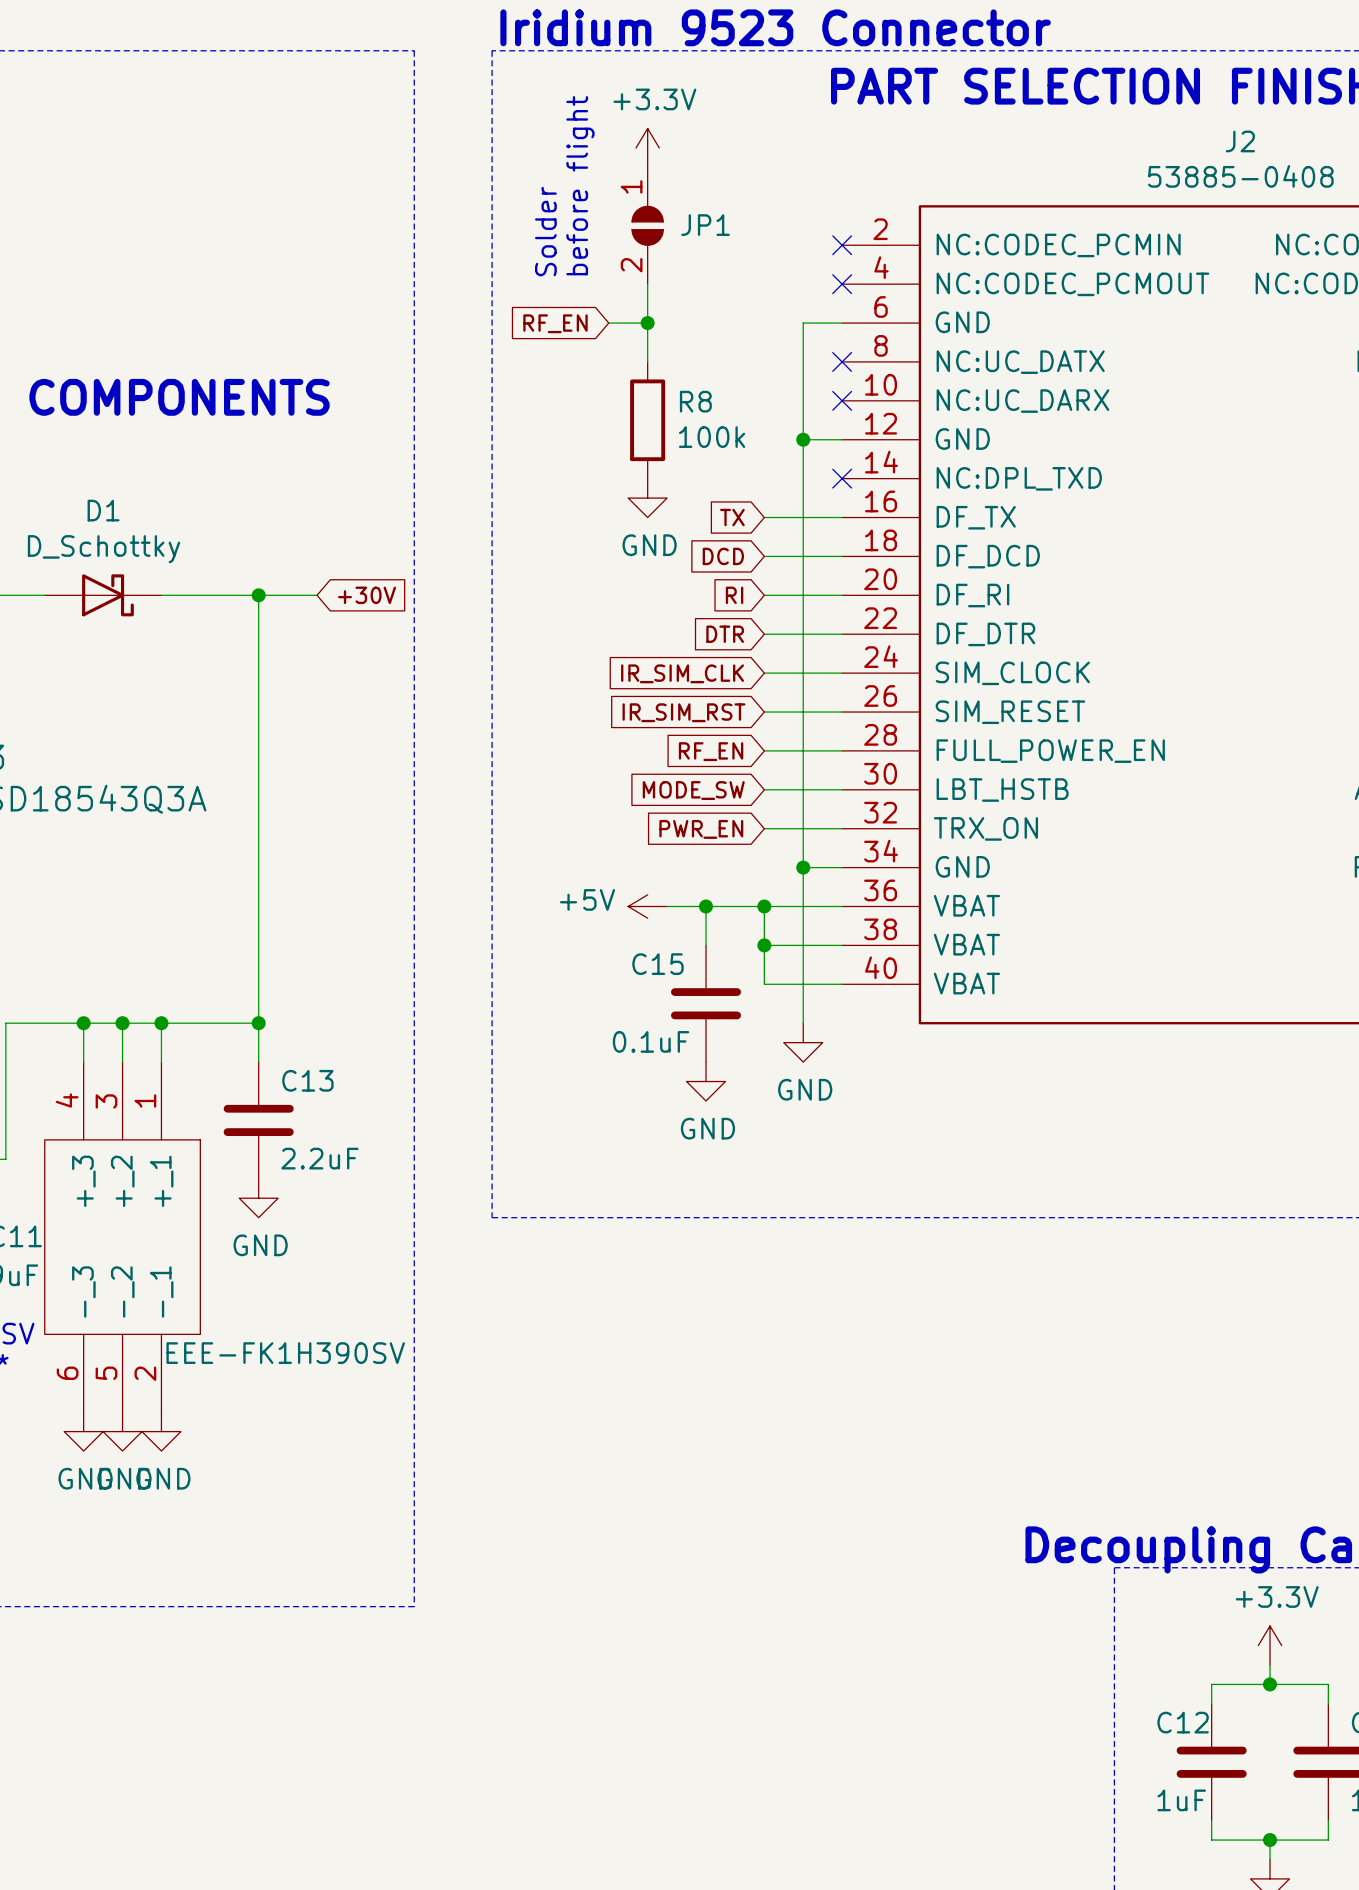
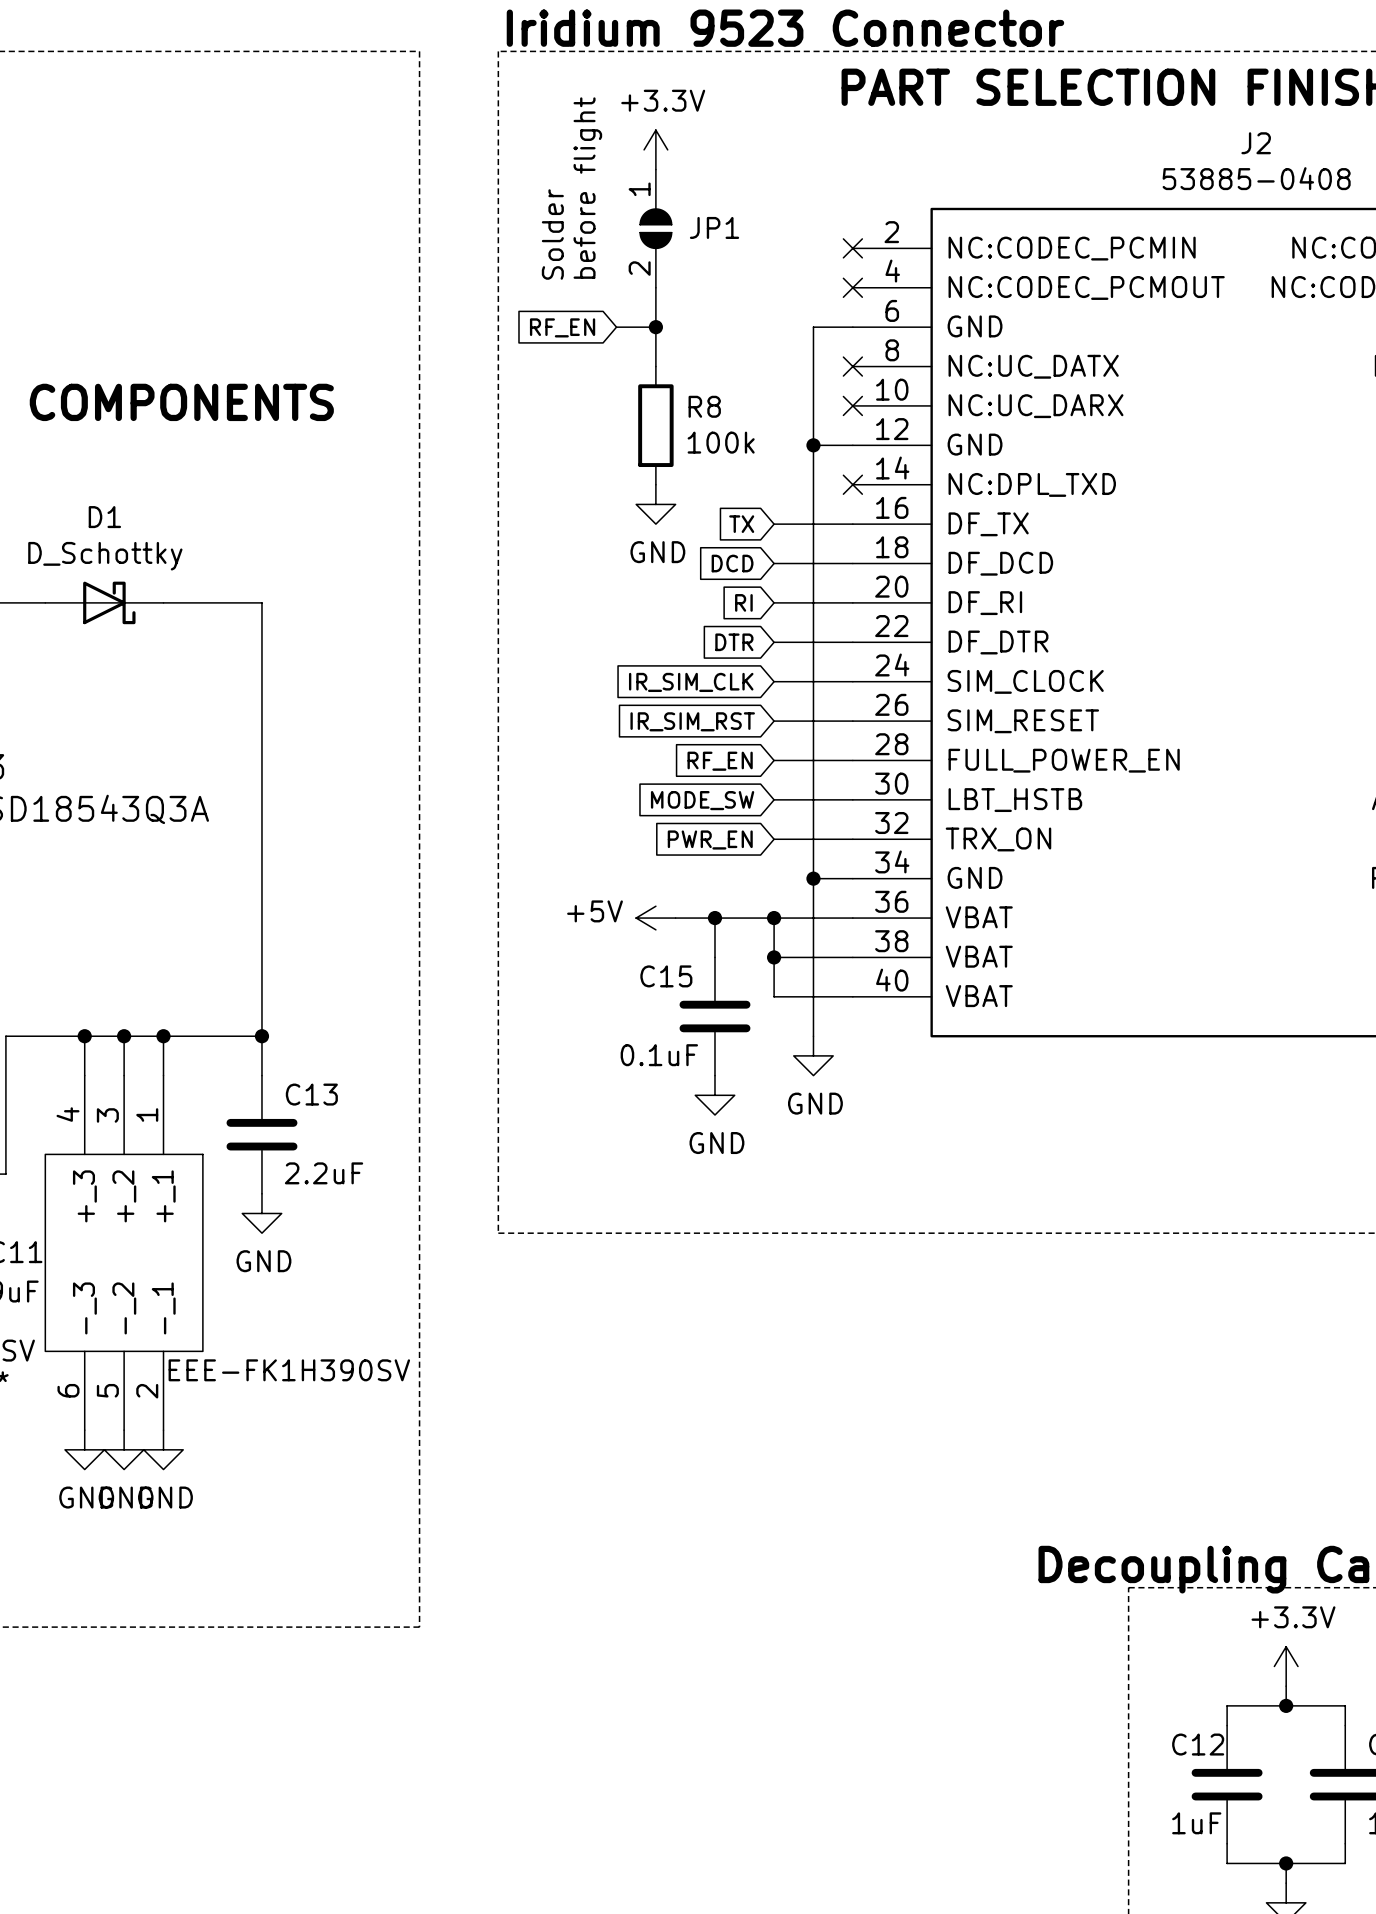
wire: (258, 595) (317, 595) -> none
junction: (258, 595) -> none
global label: +30V (367, 595) -> none

